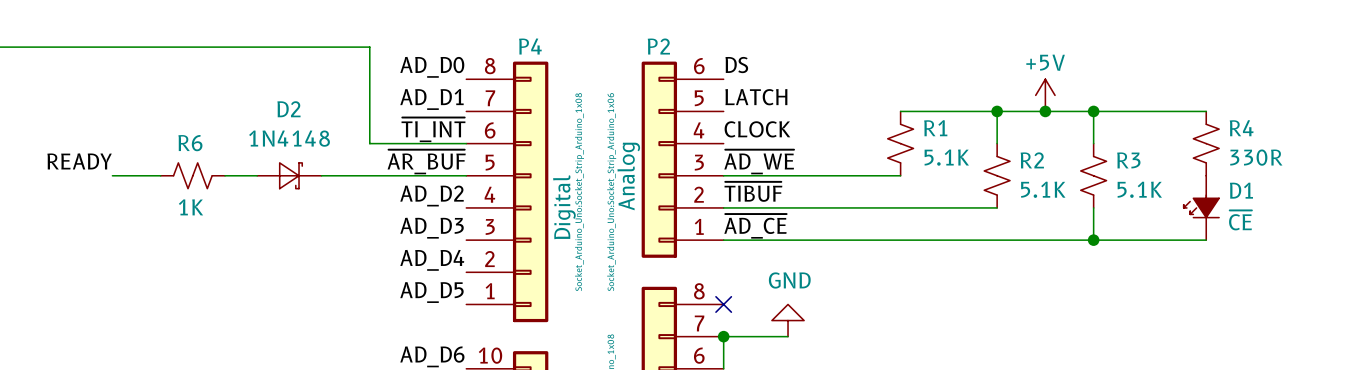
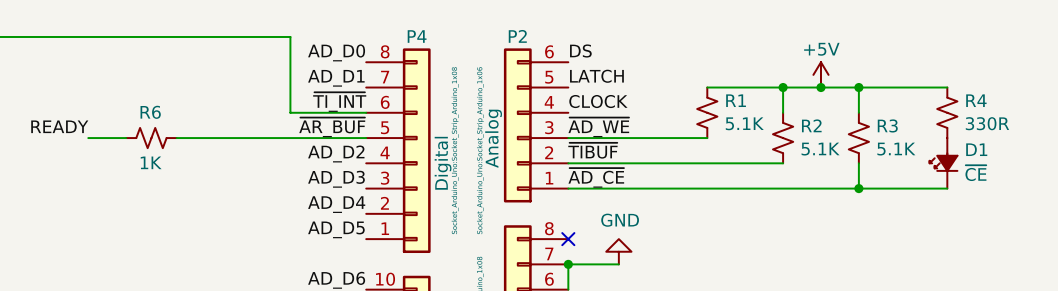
D2: 1N4148 (289, 175) -> none

